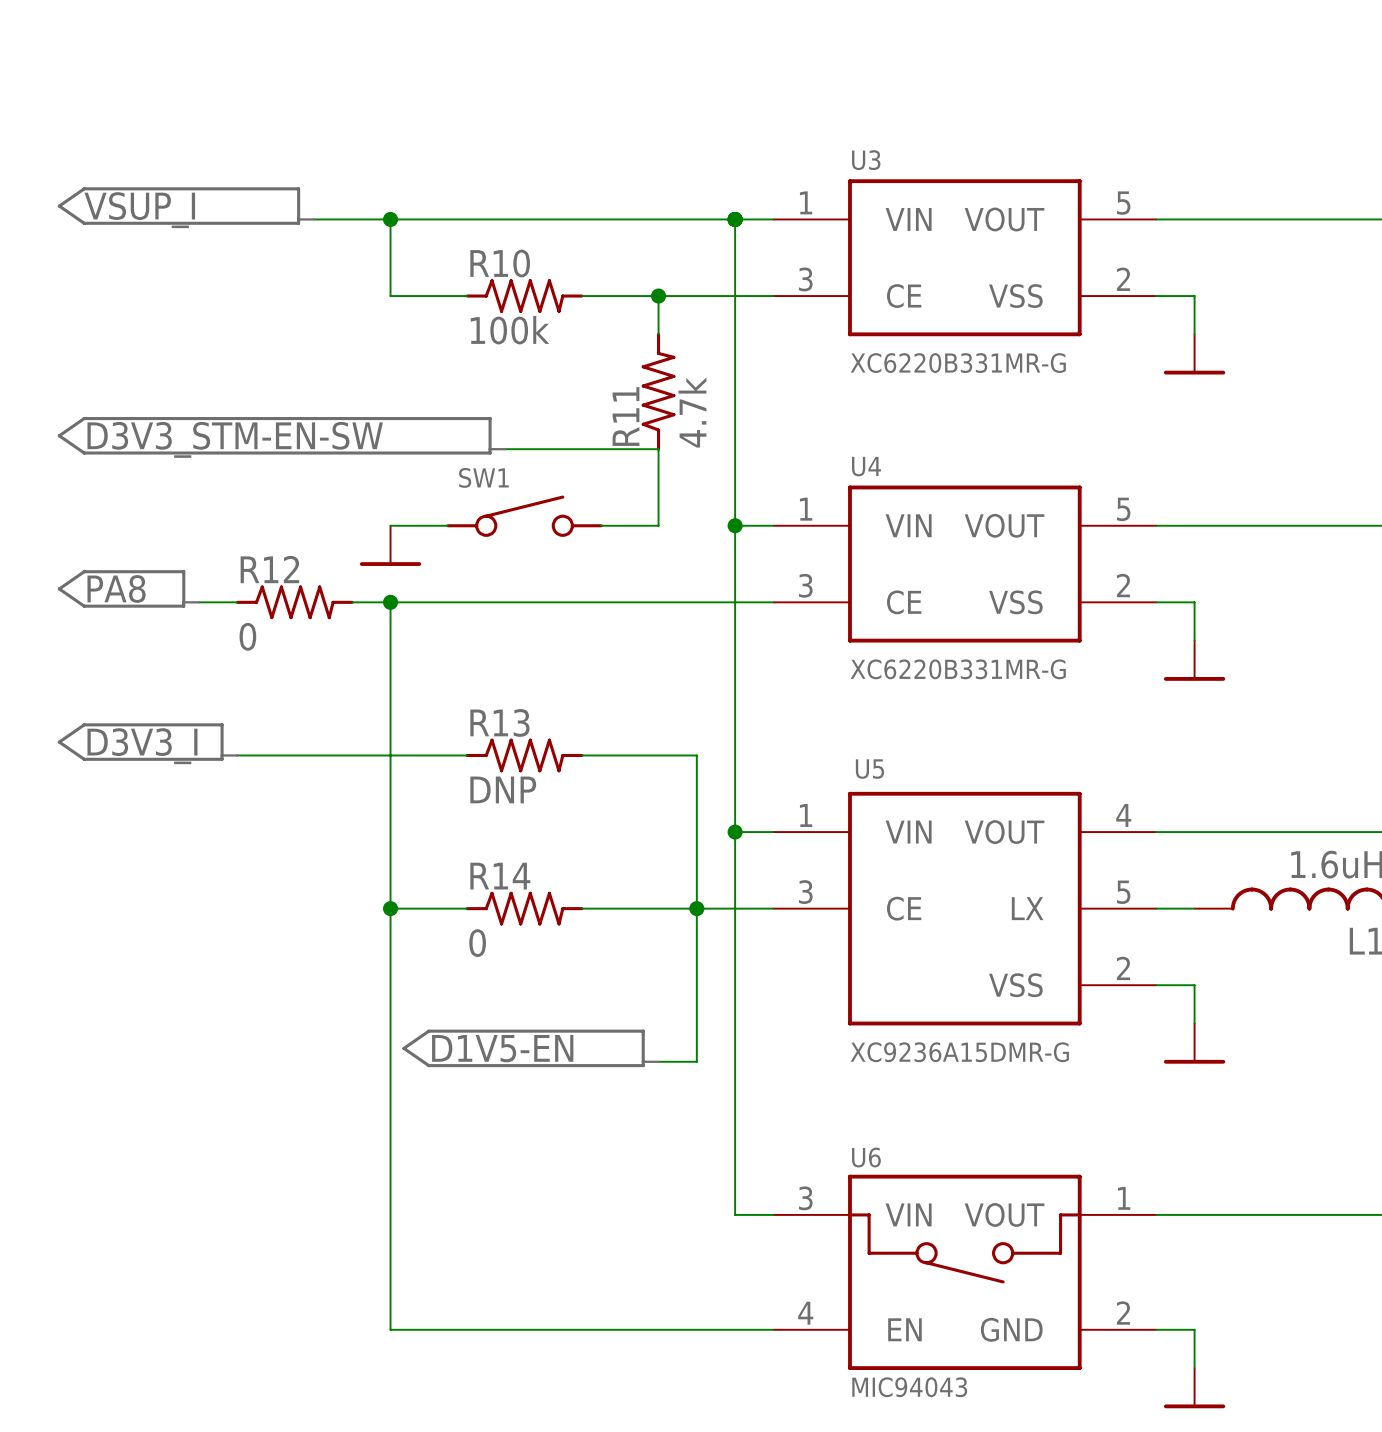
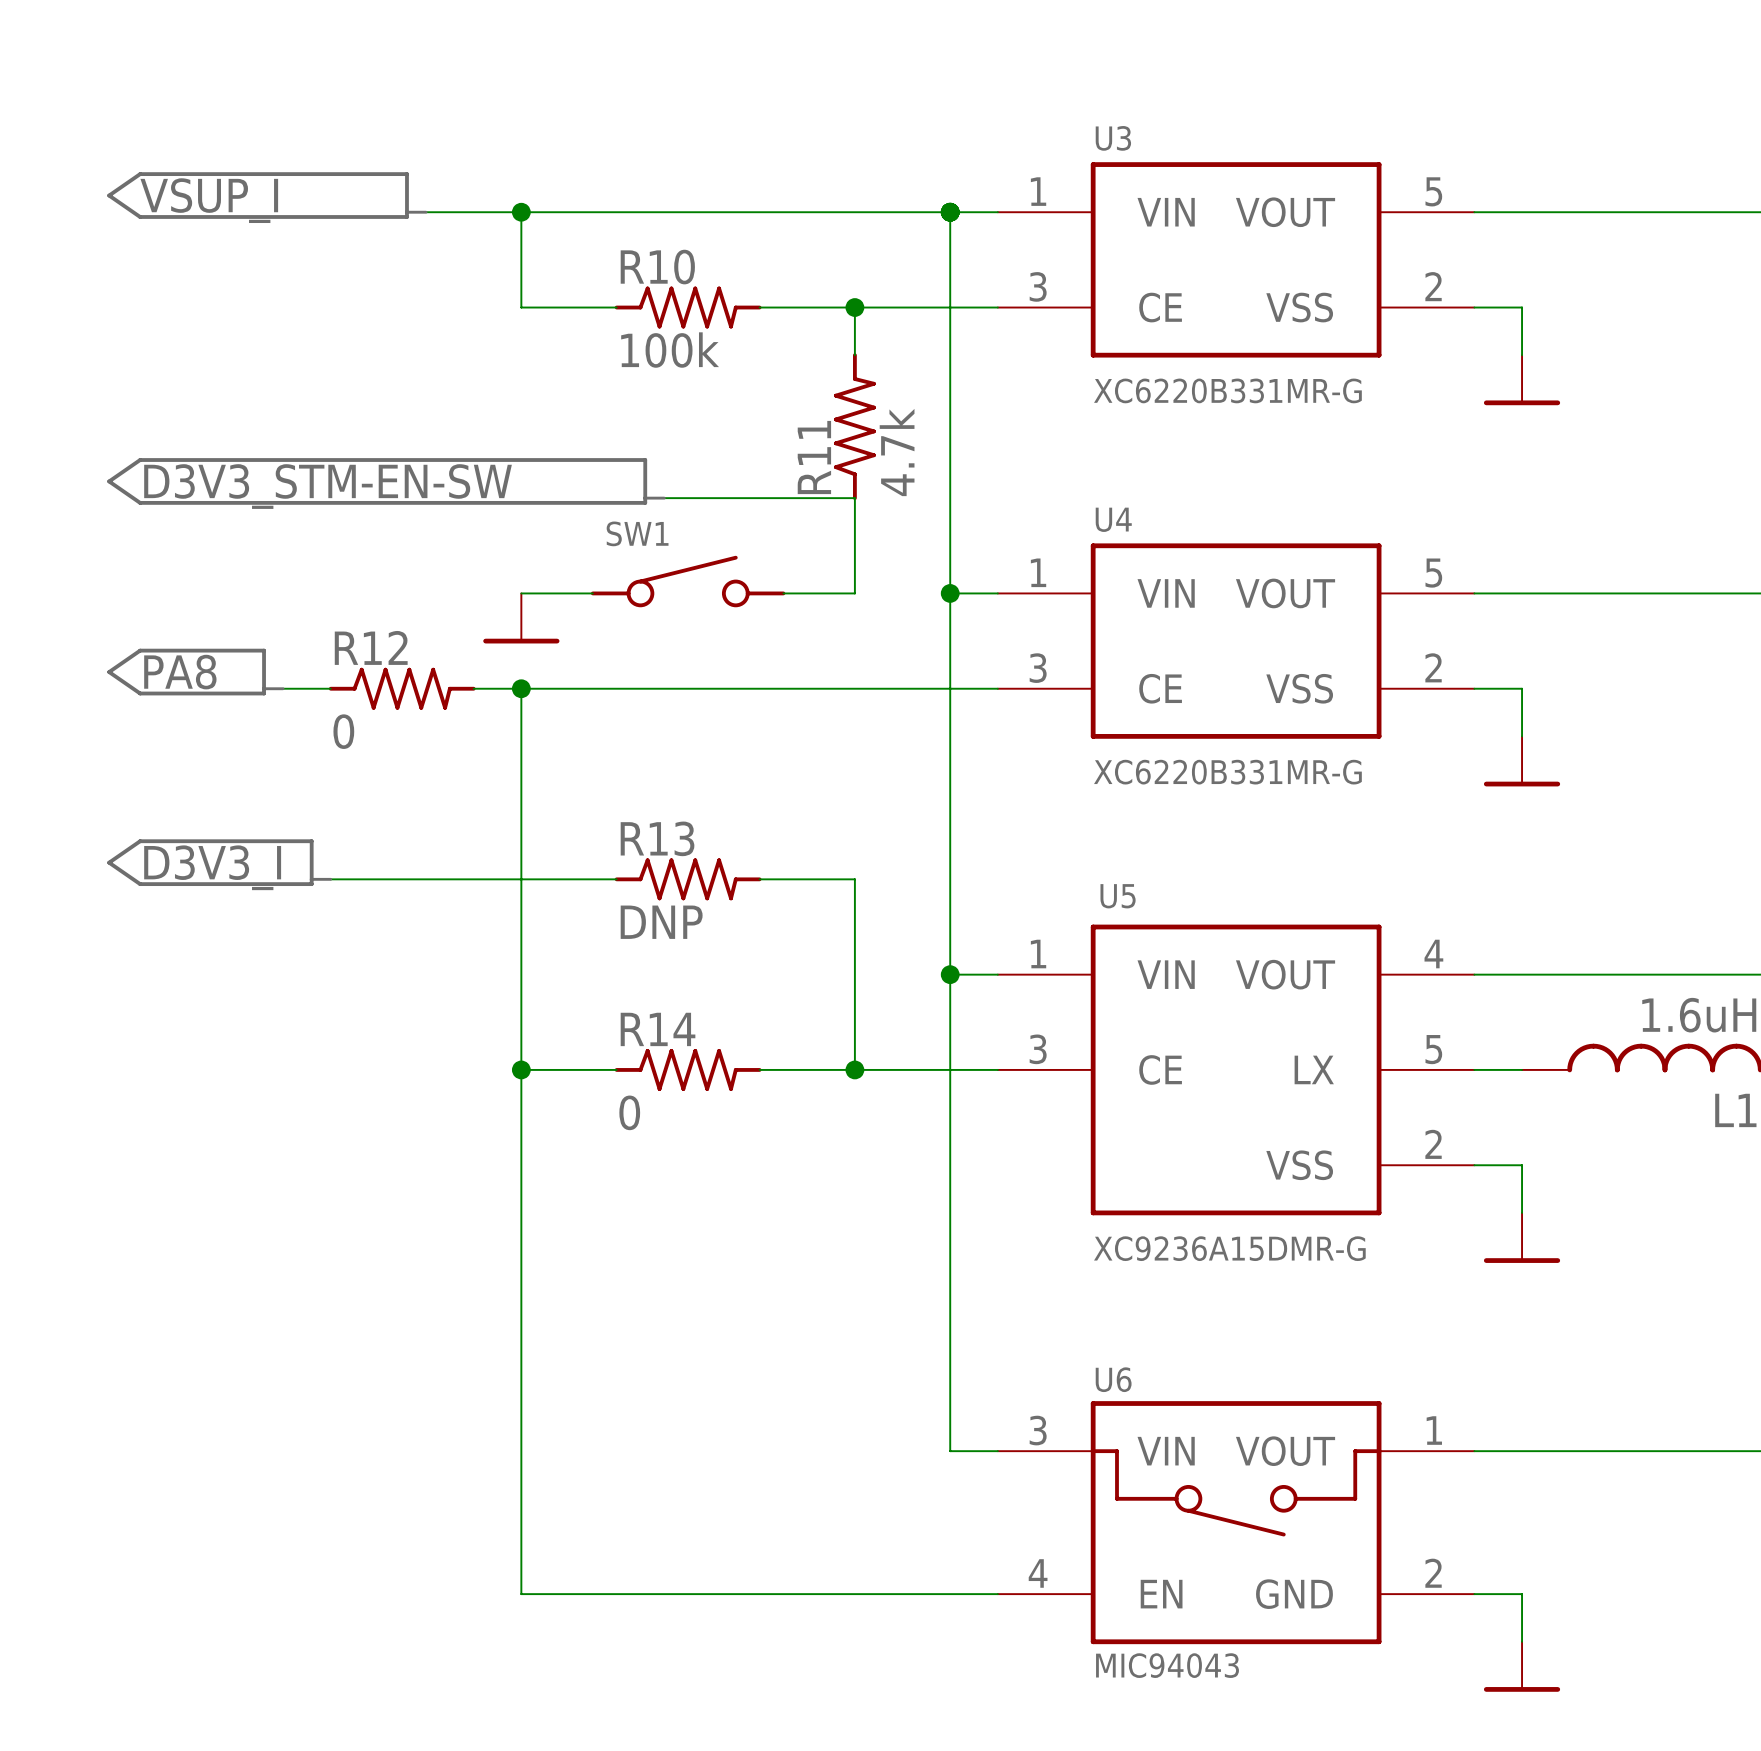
wire: (658, 755) (696, 755) (696, 1061) (658, 1061) -> (854, 879) (854, 1069)
junction position: (696, 908) -> (854, 1069)
label: D1V5-EN (502, 1048) -> none
part: (531, 1048) -> none

